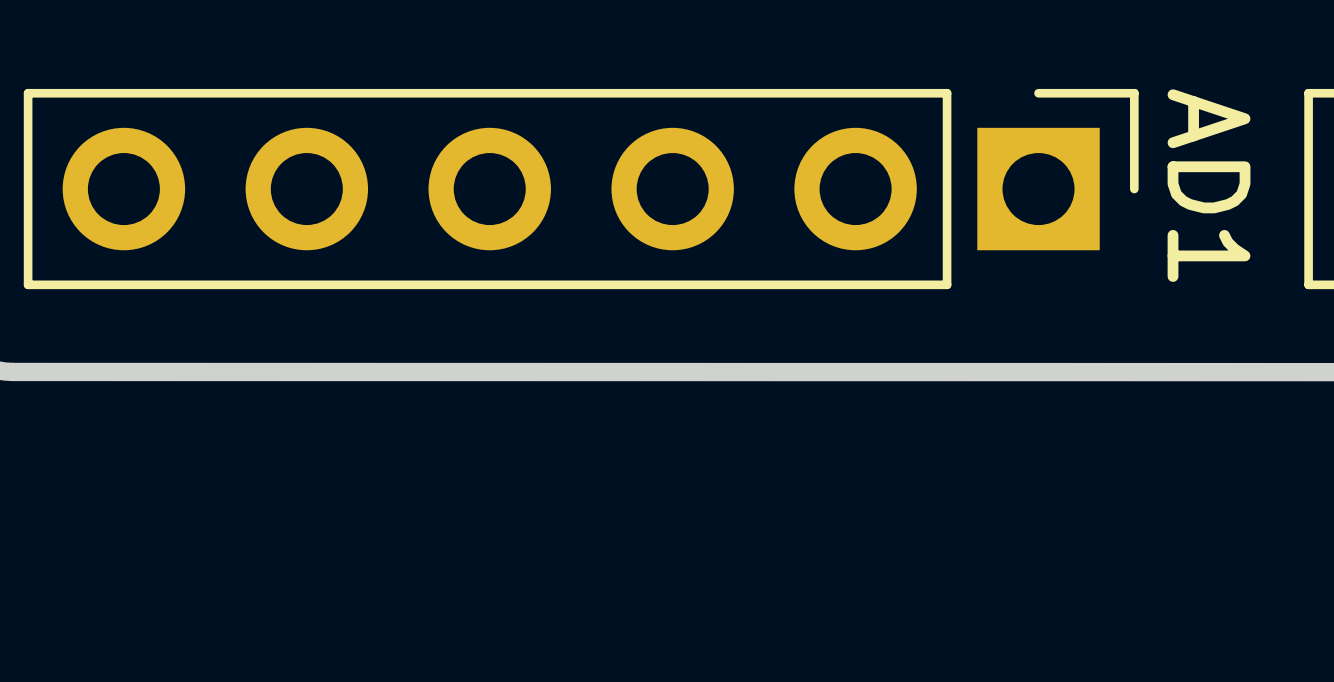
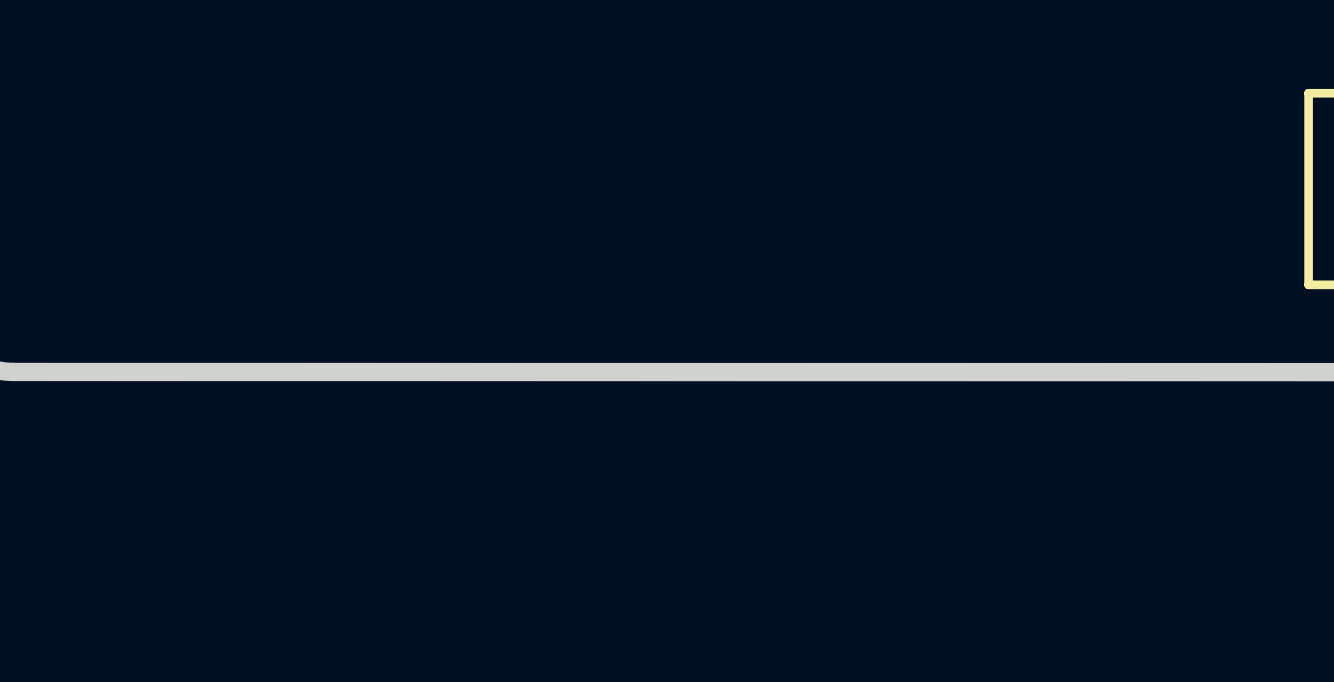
AD1: (581, 189) -> none

